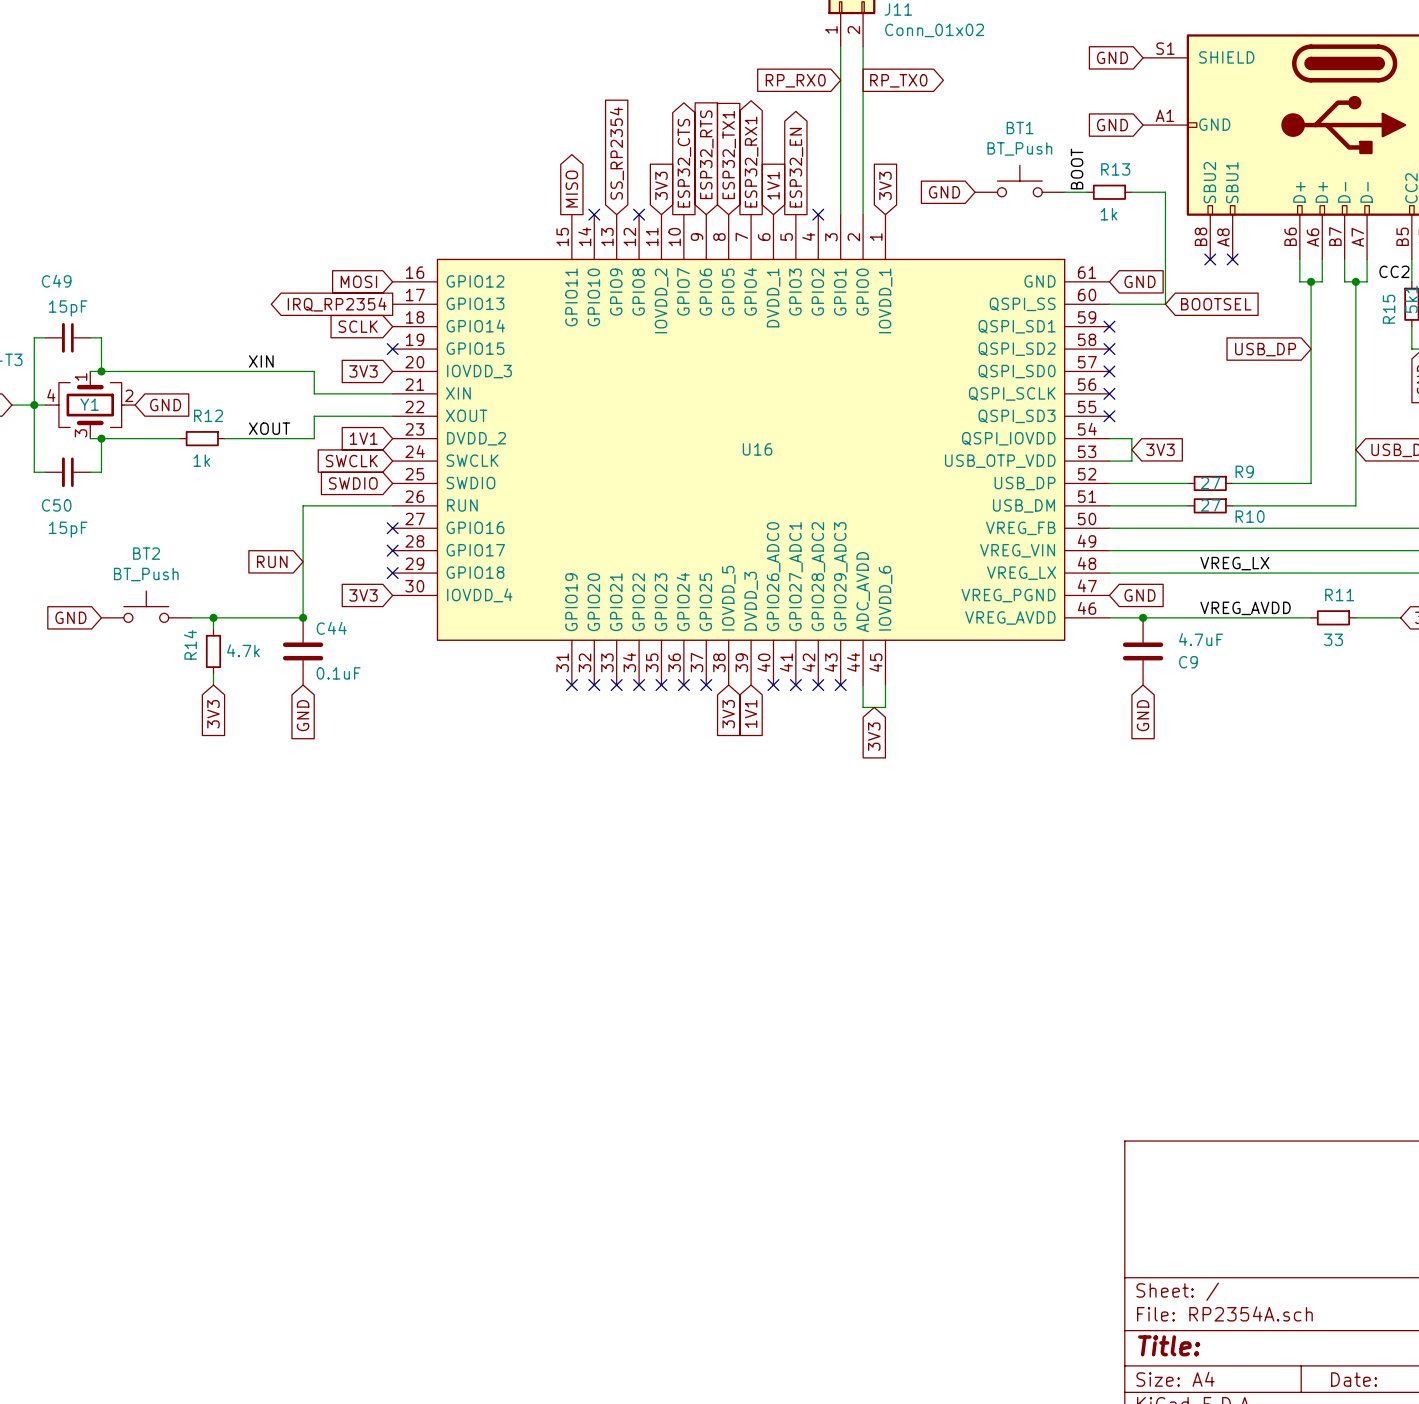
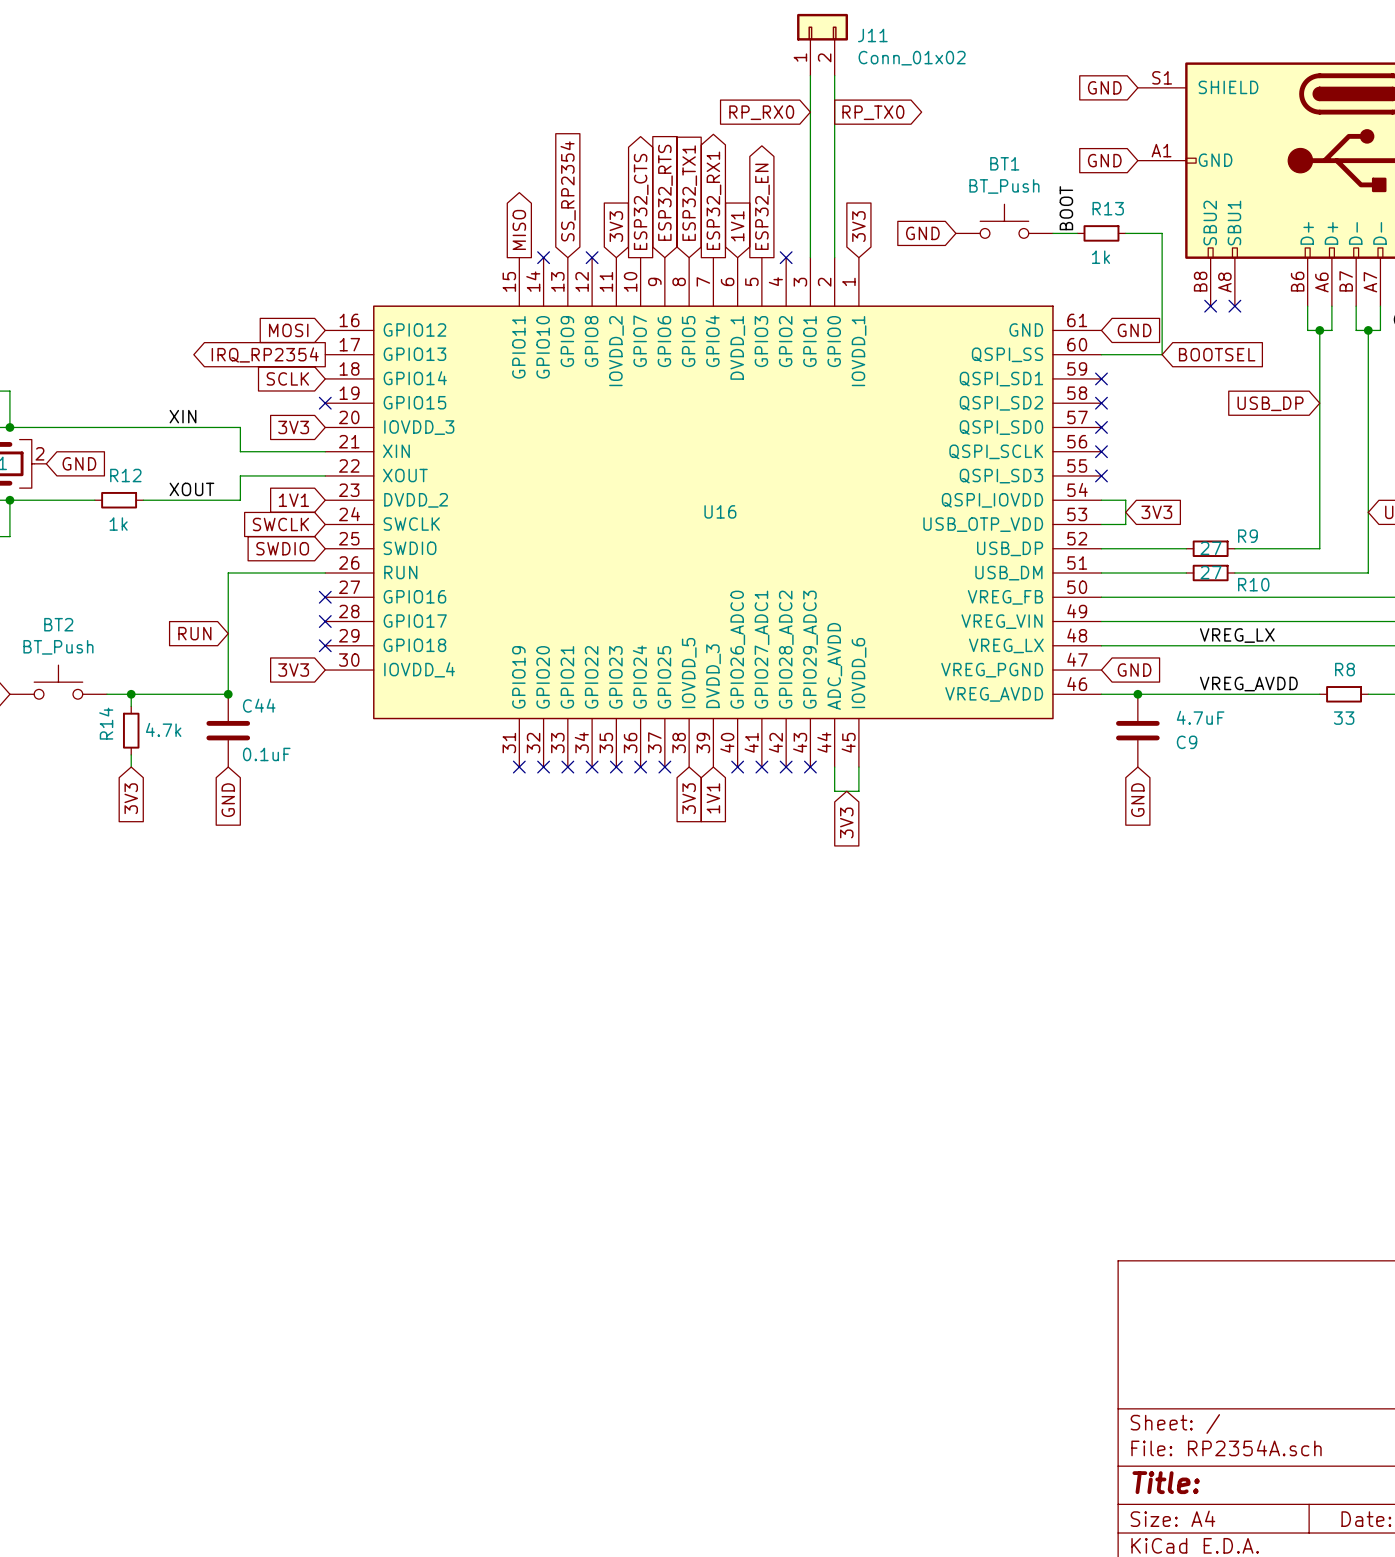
R11 name: R11 (1339, 595) -> R8 (1345, 669)

